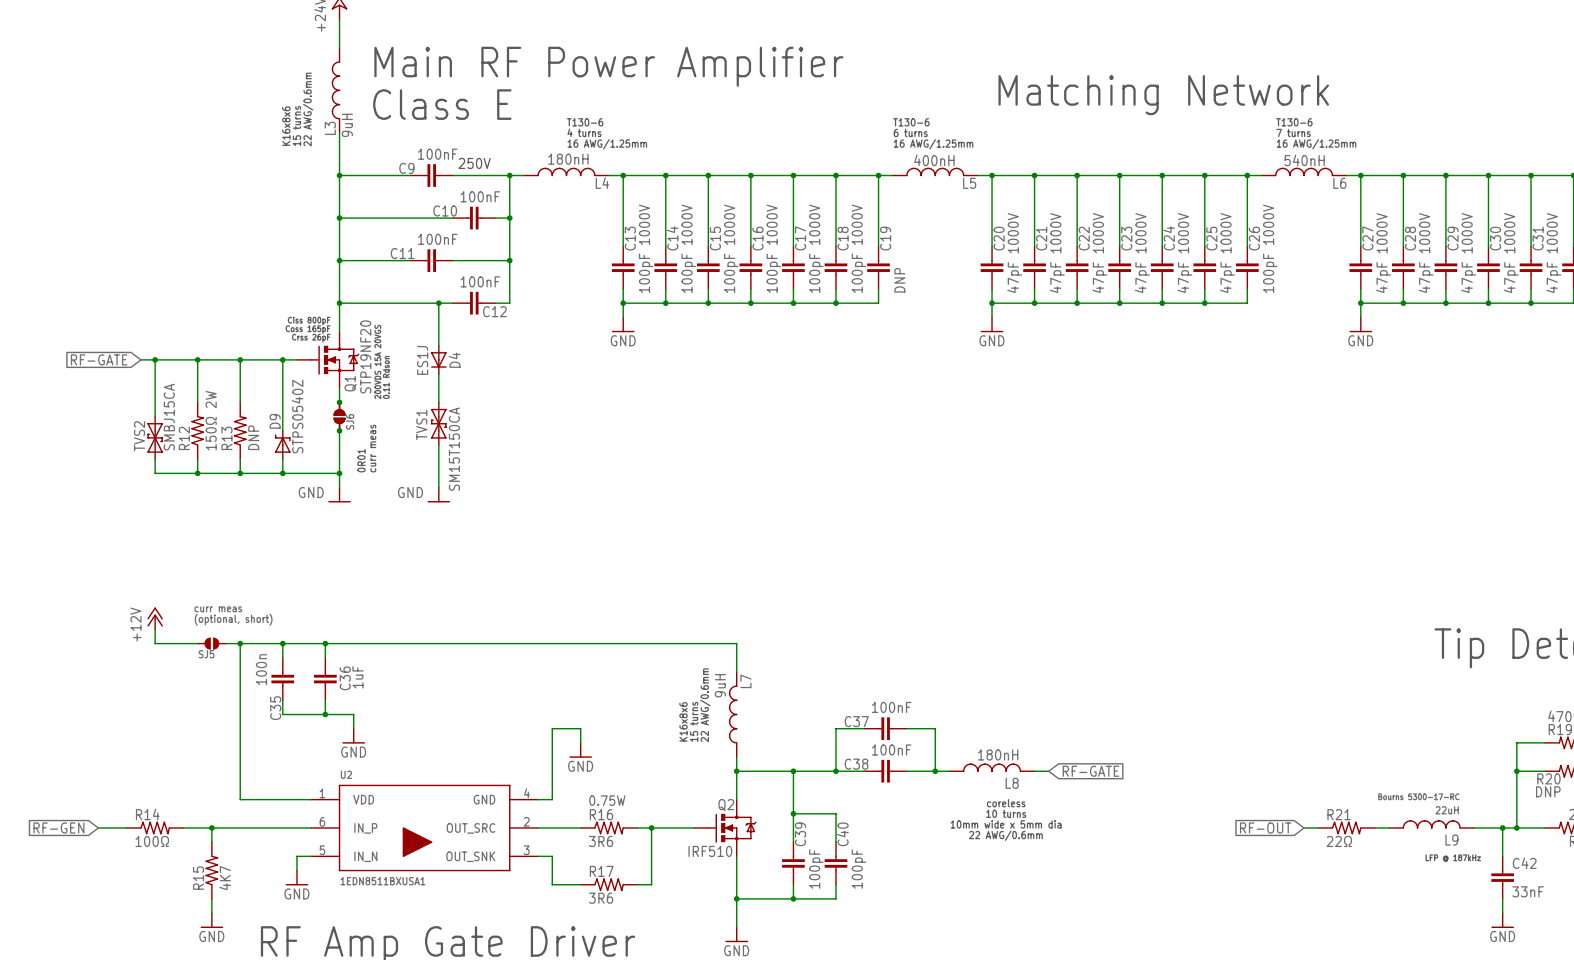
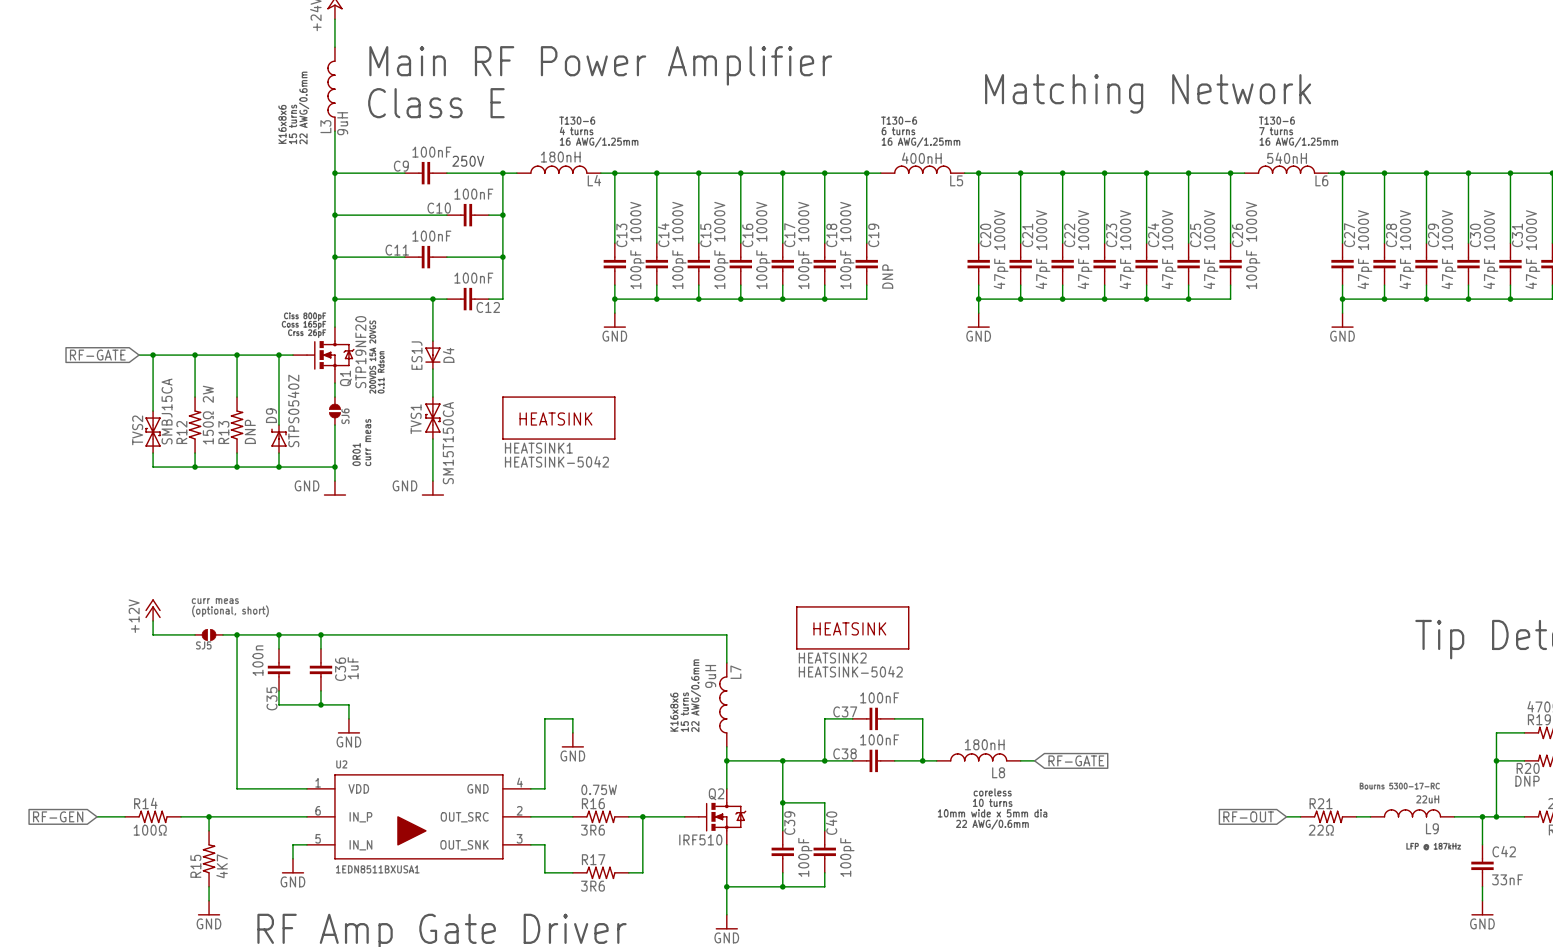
junction: (339, 402) -> none
part: (339, 416) -> none
HEATSINK1: none -> HEATSINK-5042 (558, 418)
junction: (339, 430) -> none
HEATSINK2: none -> HEATSINK-5042 (852, 627)

